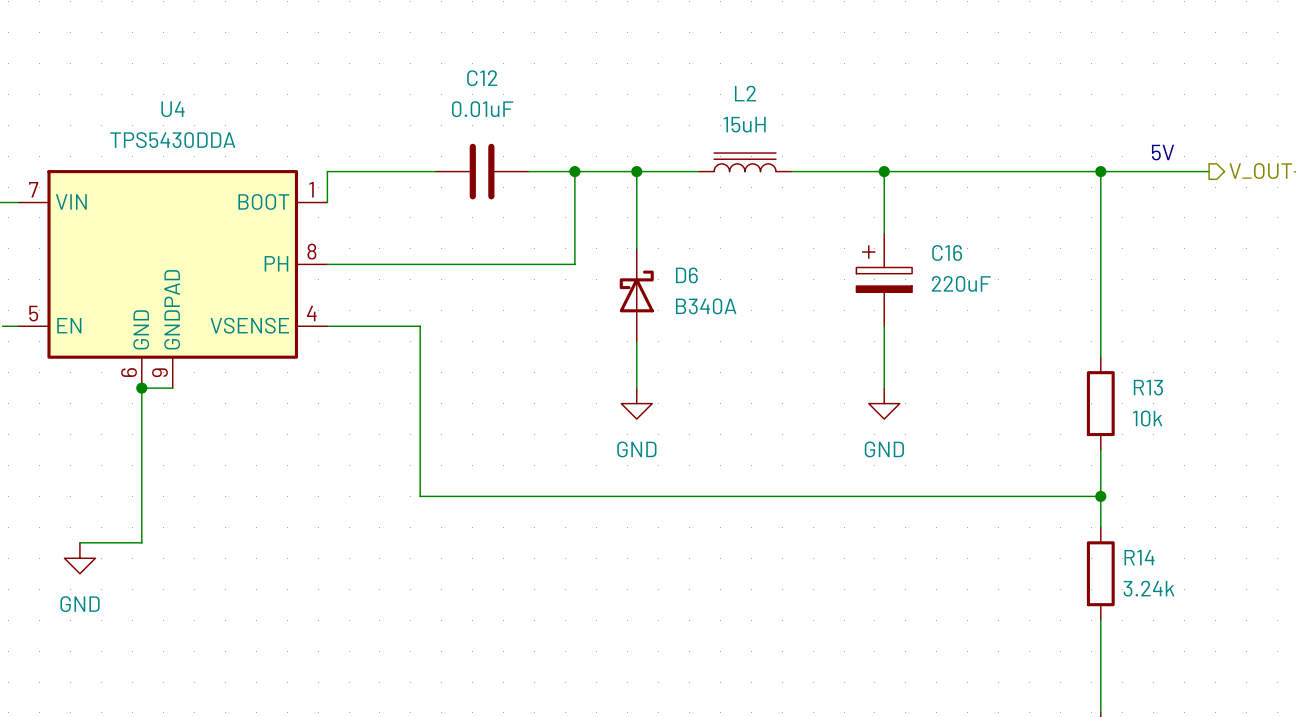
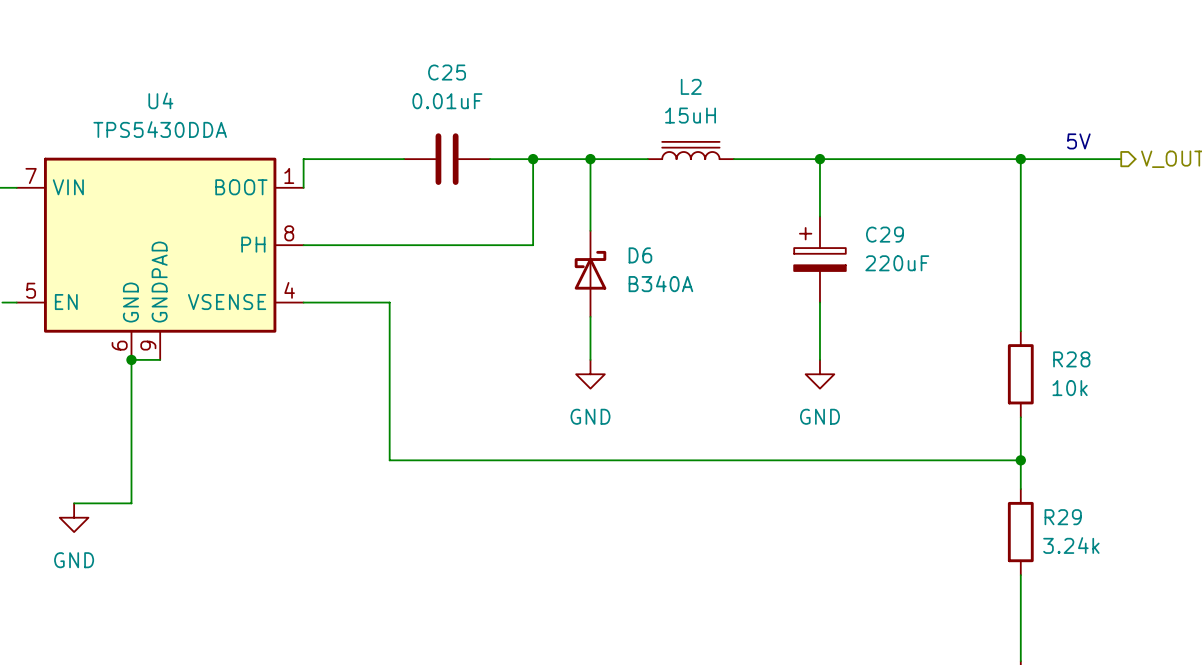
C12 name: C12 (482, 78) -> C25 (447, 72)
C16 name: C16 (947, 253) -> C29 (884, 234)
R13 name: R13 (1148, 387) -> R28 (1071, 359)
R14 name: R14 (1139, 557) -> R29 (1063, 517)

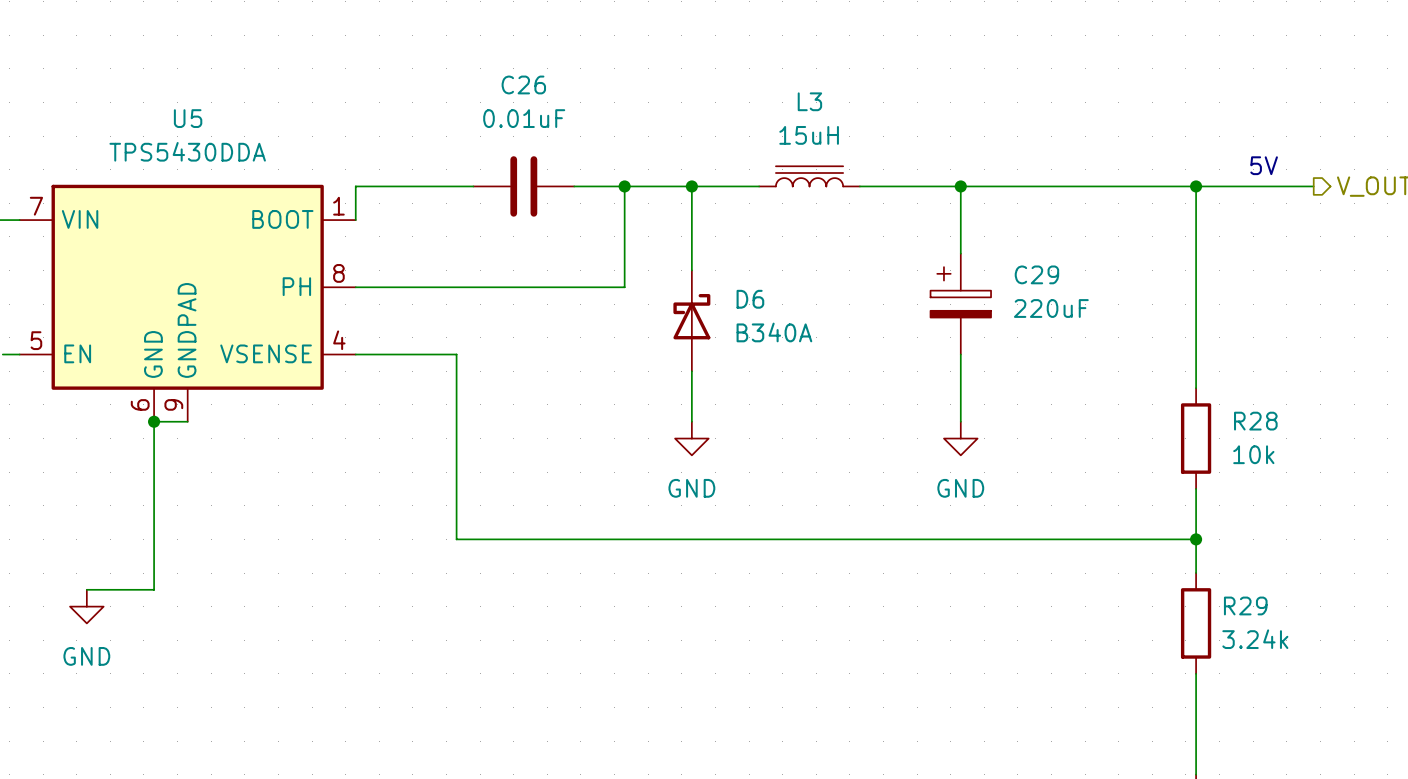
C25 name: C25 (447, 72) -> C26 (523, 84)
L2 name: L2 (691, 86) -> L3 (809, 101)
U4 name: U4 (160, 100) -> U5 (188, 118)

